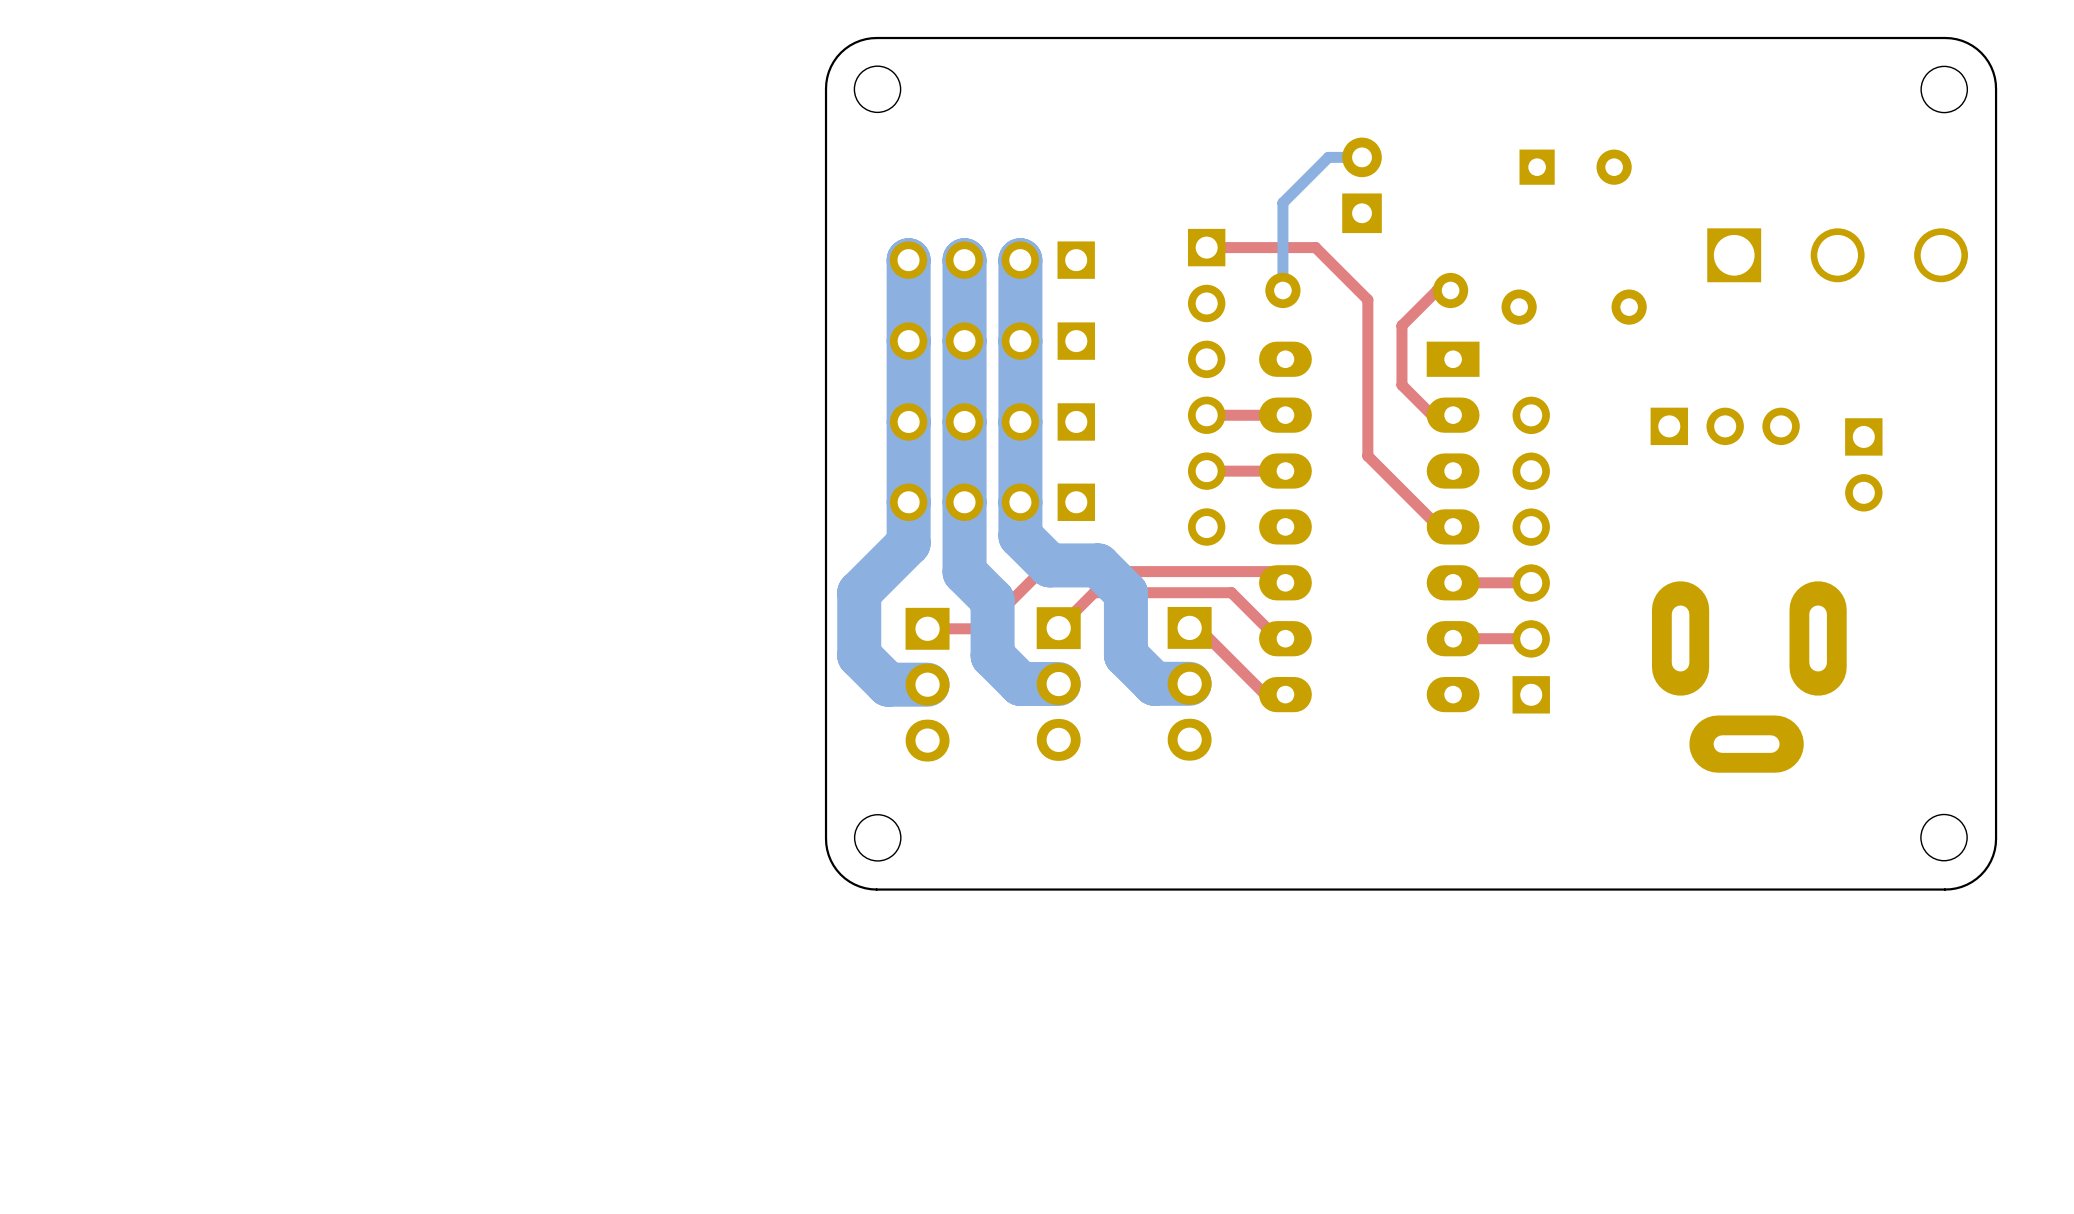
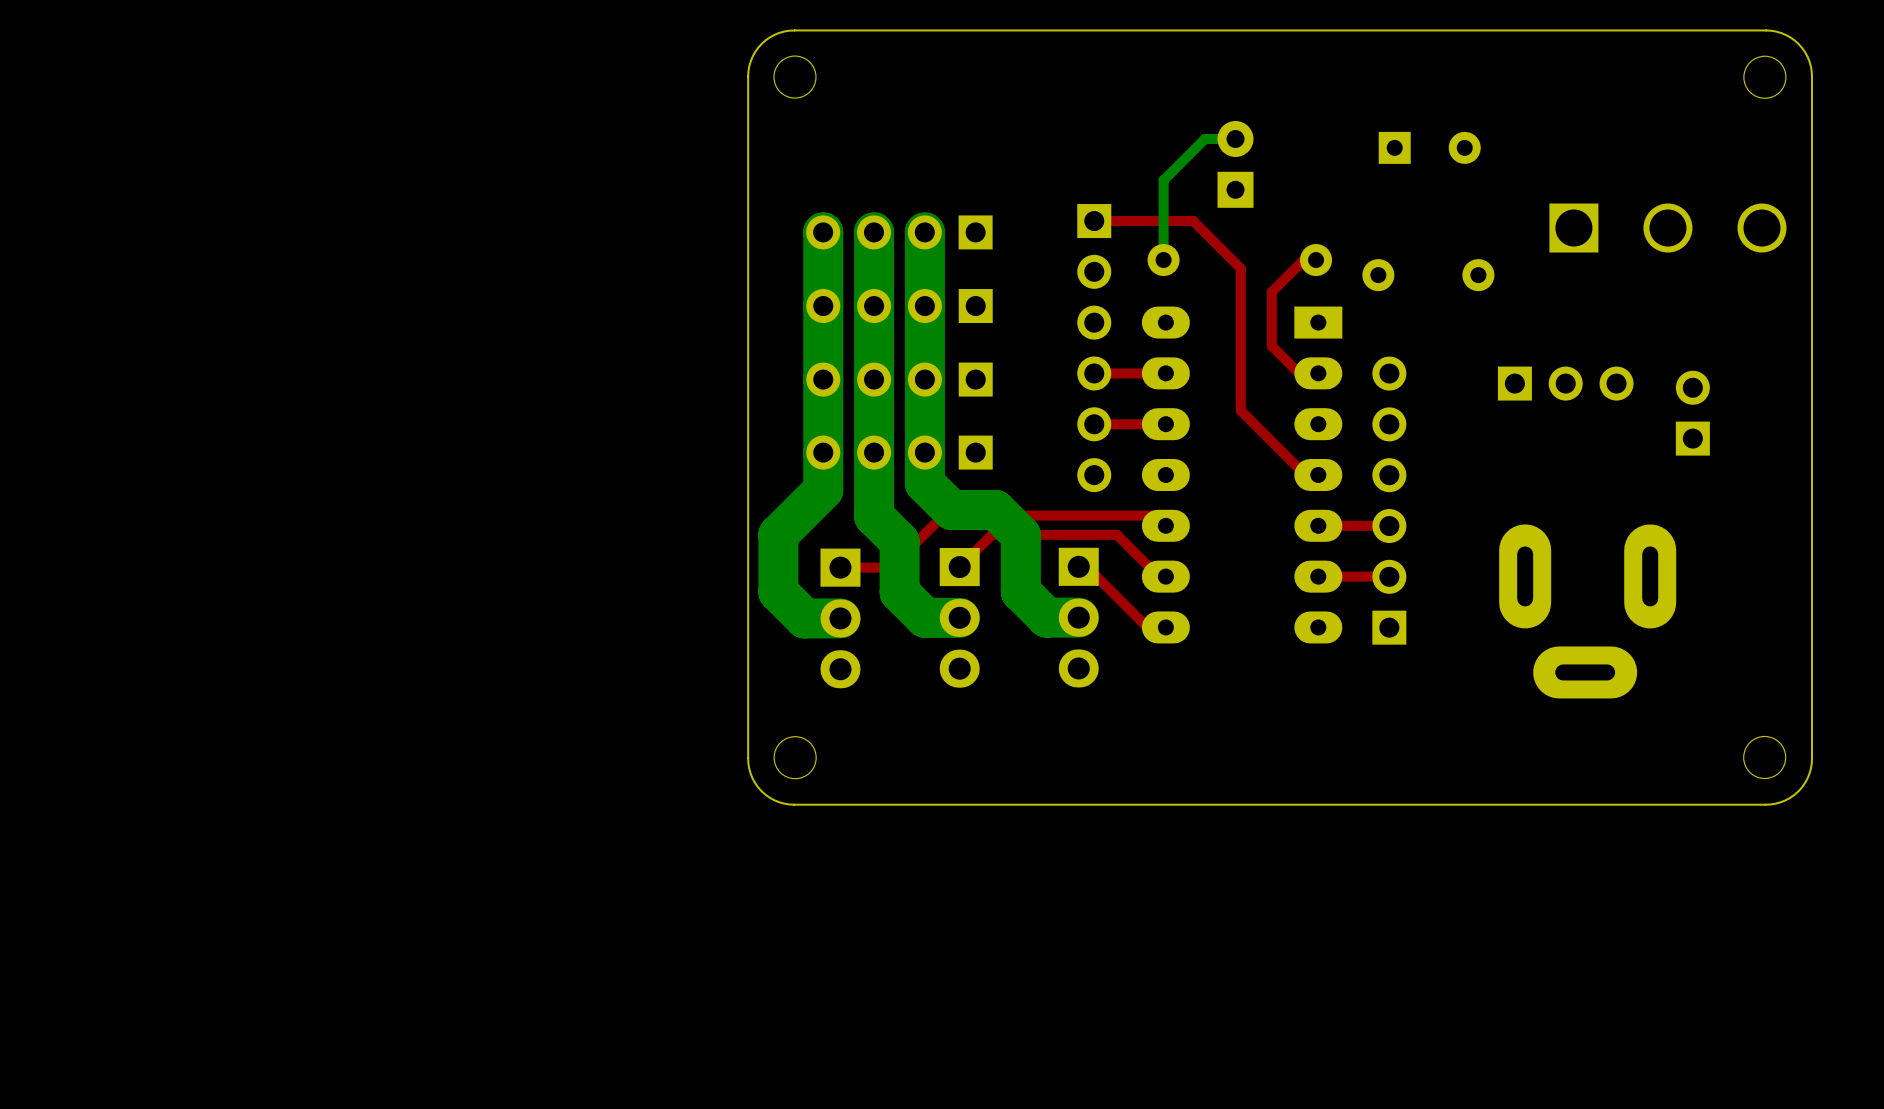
part rotation: 0° (1863, 464) -> 180° (1692, 413)

